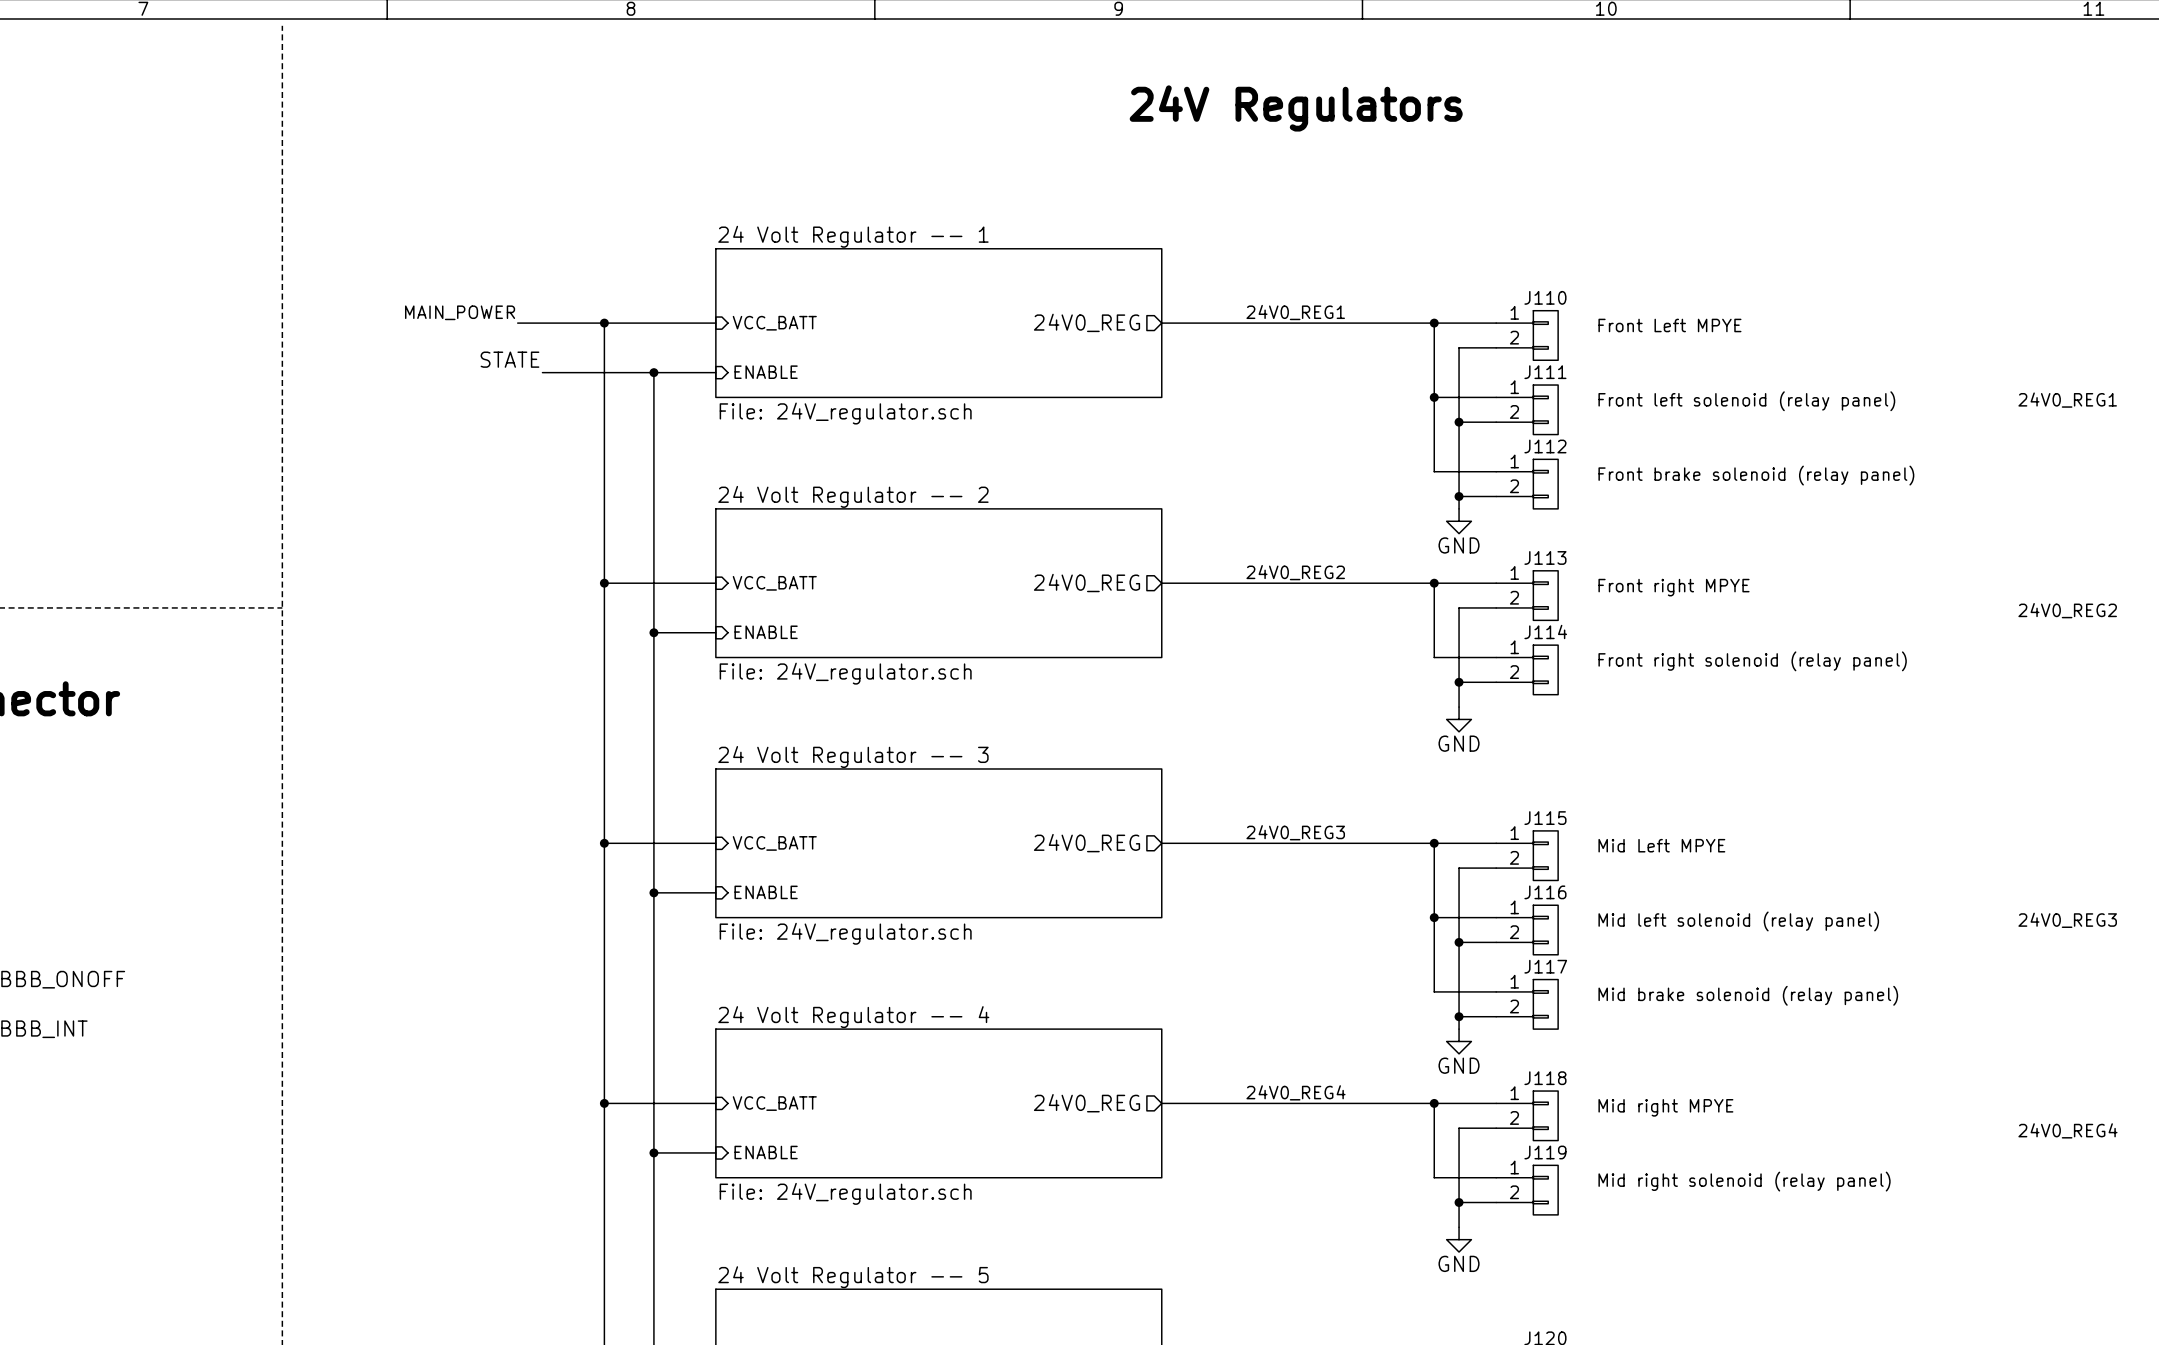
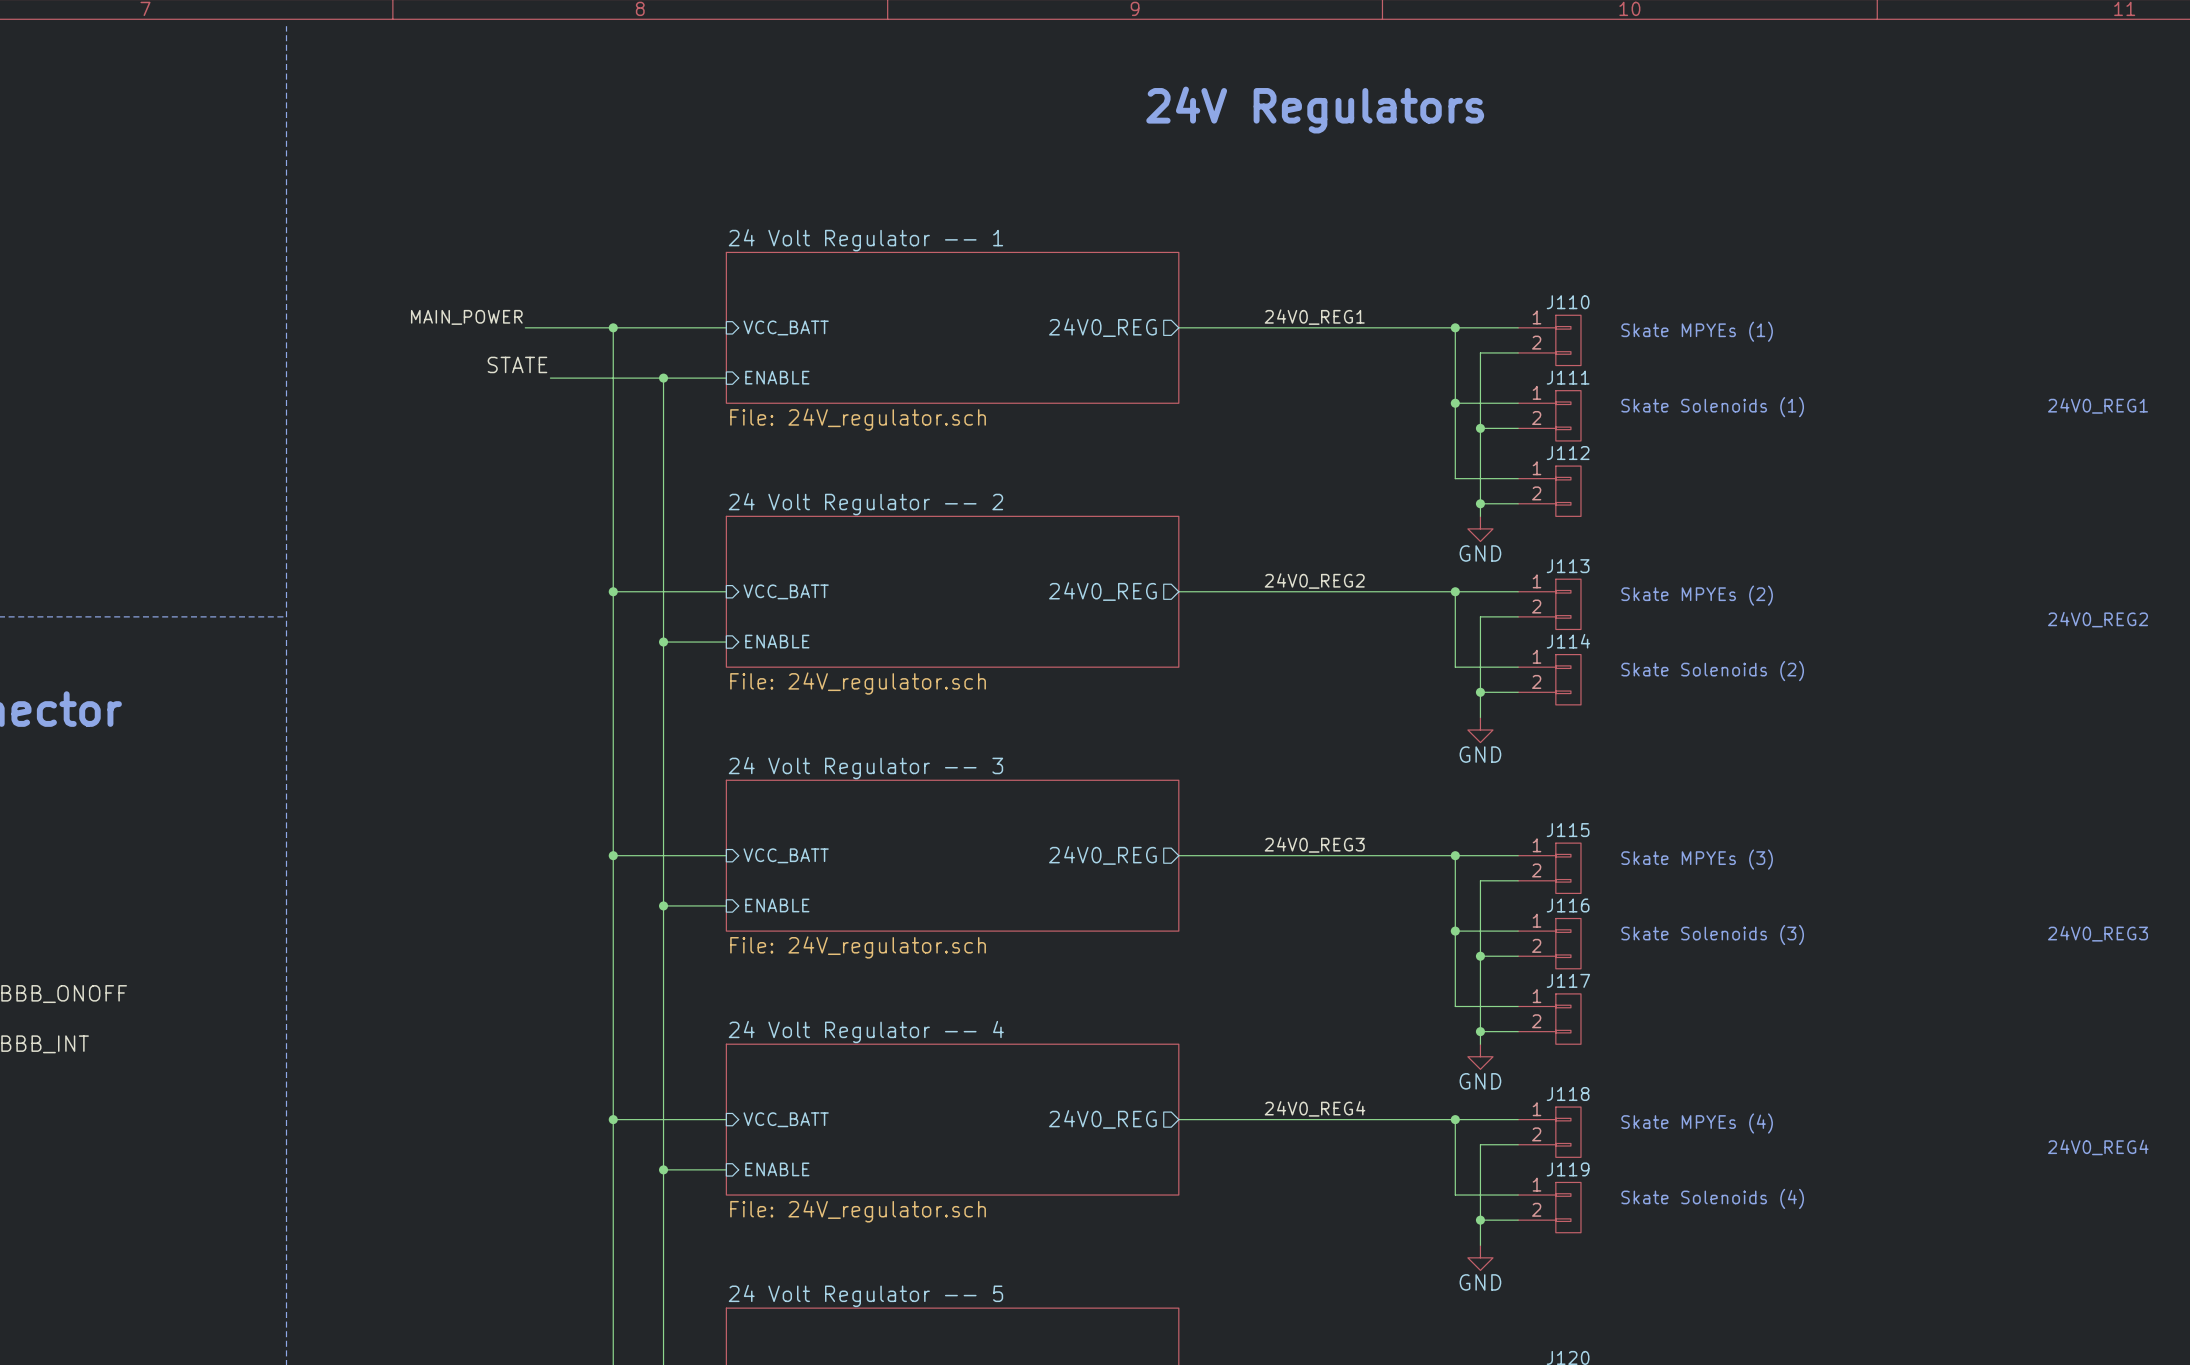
text: Front Left MPYE (1669, 325) -> Skate MPYEs (1) (1697, 331)
text: Front left solenoid (relay panel) (1746, 401) -> Skate Solenoids (1) (1712, 407)
text: Front brake solenoid (relay panel) (1756, 475) -> none
text: Front right MPYE (1674, 587) -> Skate MPYEs (2) (1697, 595)
text: Front right solenoid (relay panel) (1752, 661) -> Skate Solenoids (2) (1712, 671)
text: Mid Left MPYE (1661, 845) -> Skate MPYEs (3) (1697, 859)
text: Mid left solenoid (relay panel) (1738, 921) -> Skate Solenoids (3) (1712, 934)
text: Mid brake solenoid (relay panel) (1748, 995) -> none
text: Mid right MPYE (1665, 1107) -> Skate MPYEs (4) (1697, 1123)
text: Mid right solenoid (relay panel) (1744, 1181) -> Skate Solenoids (4) (1712, 1198)

